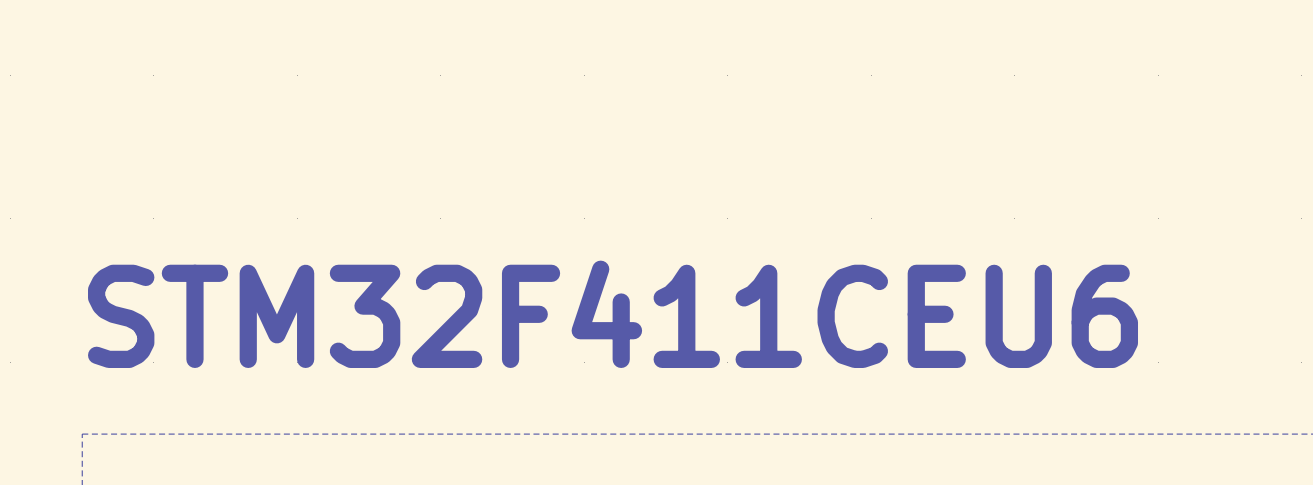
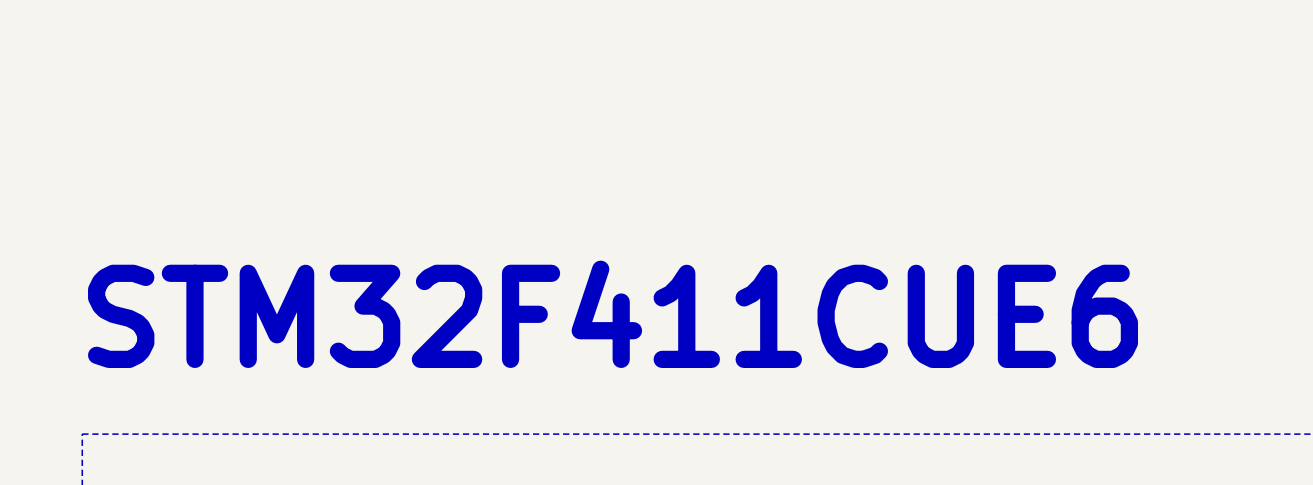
text: STM32F411CEU6 (613, 314) -> STM32F411CUE6 (613, 314)

